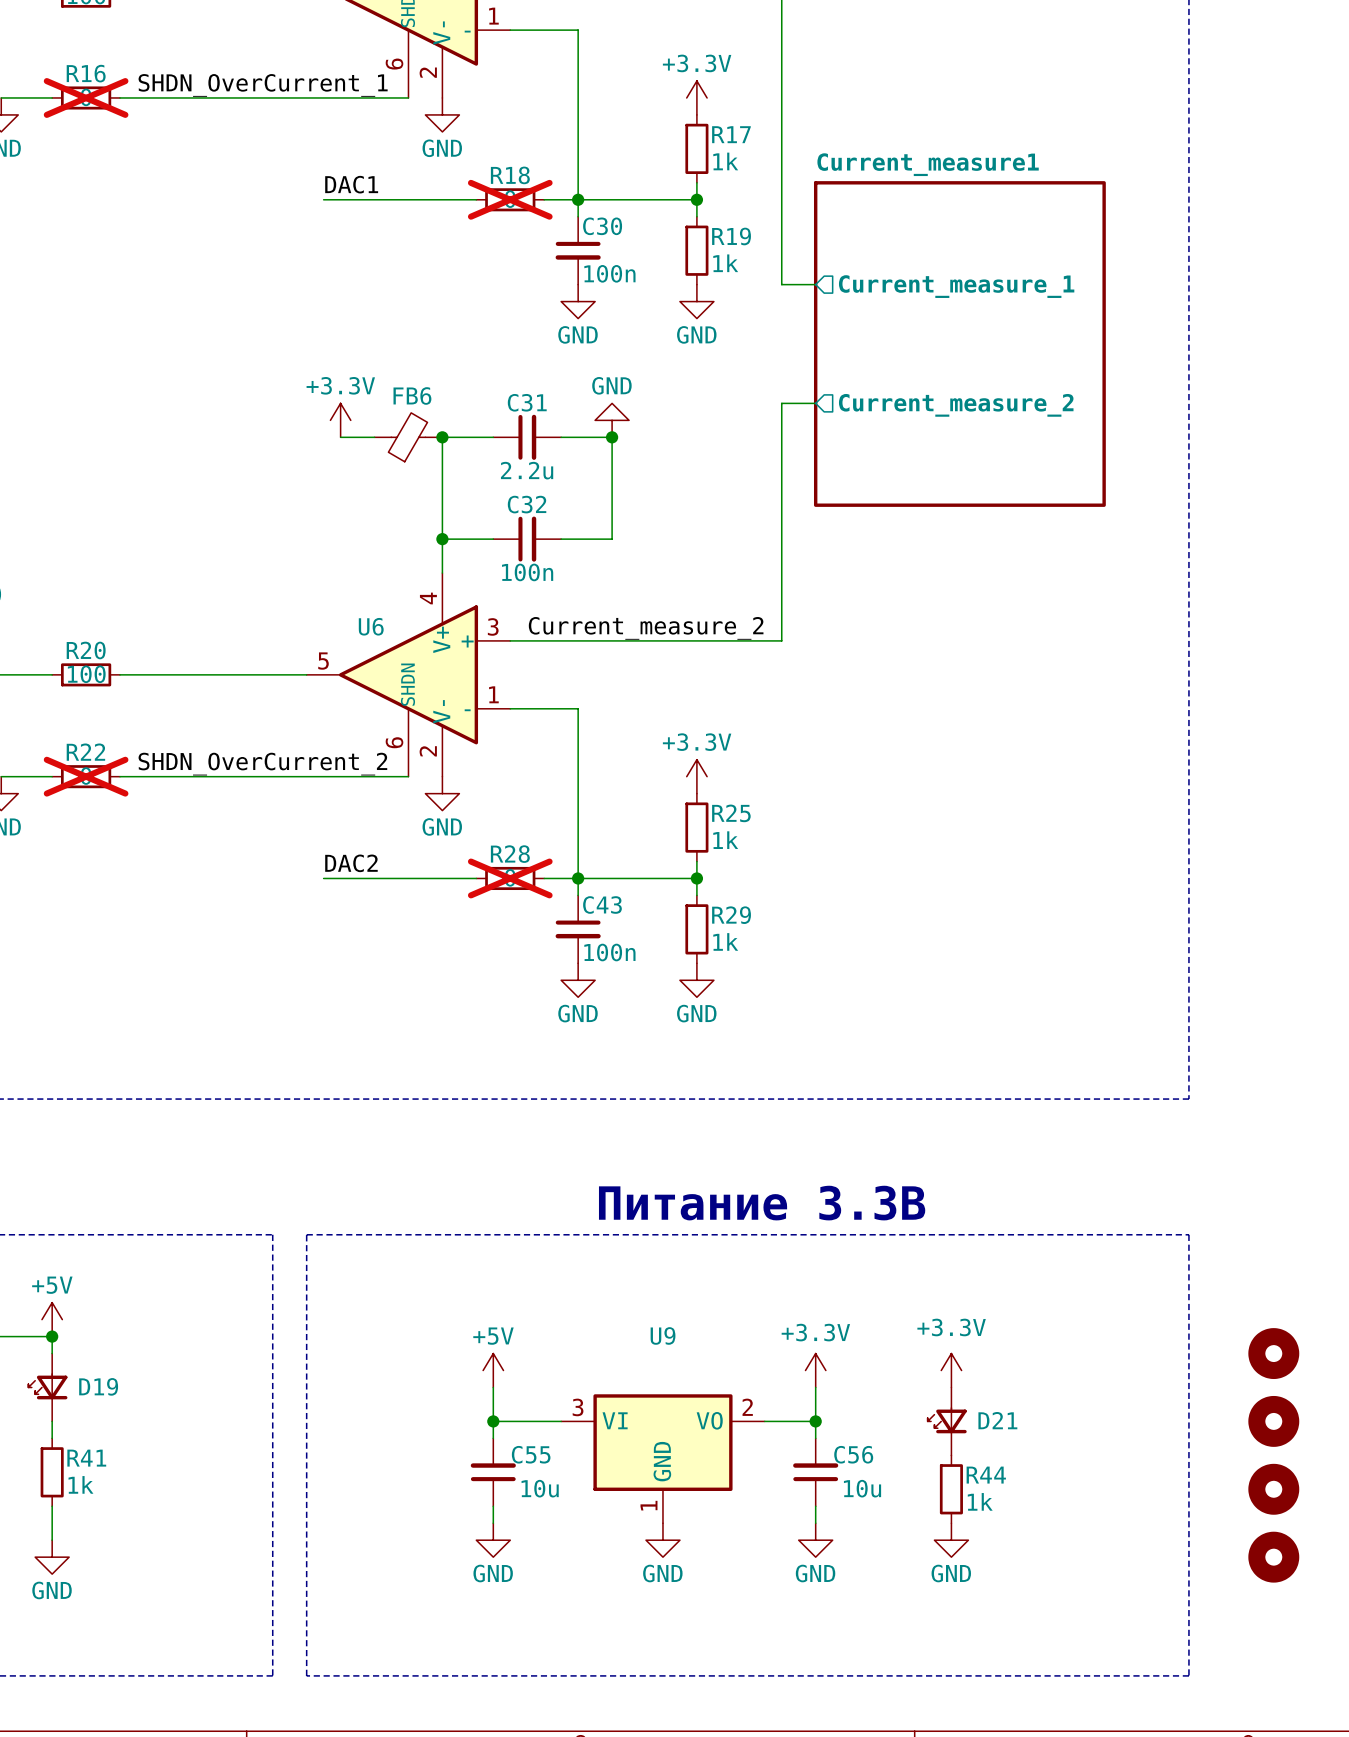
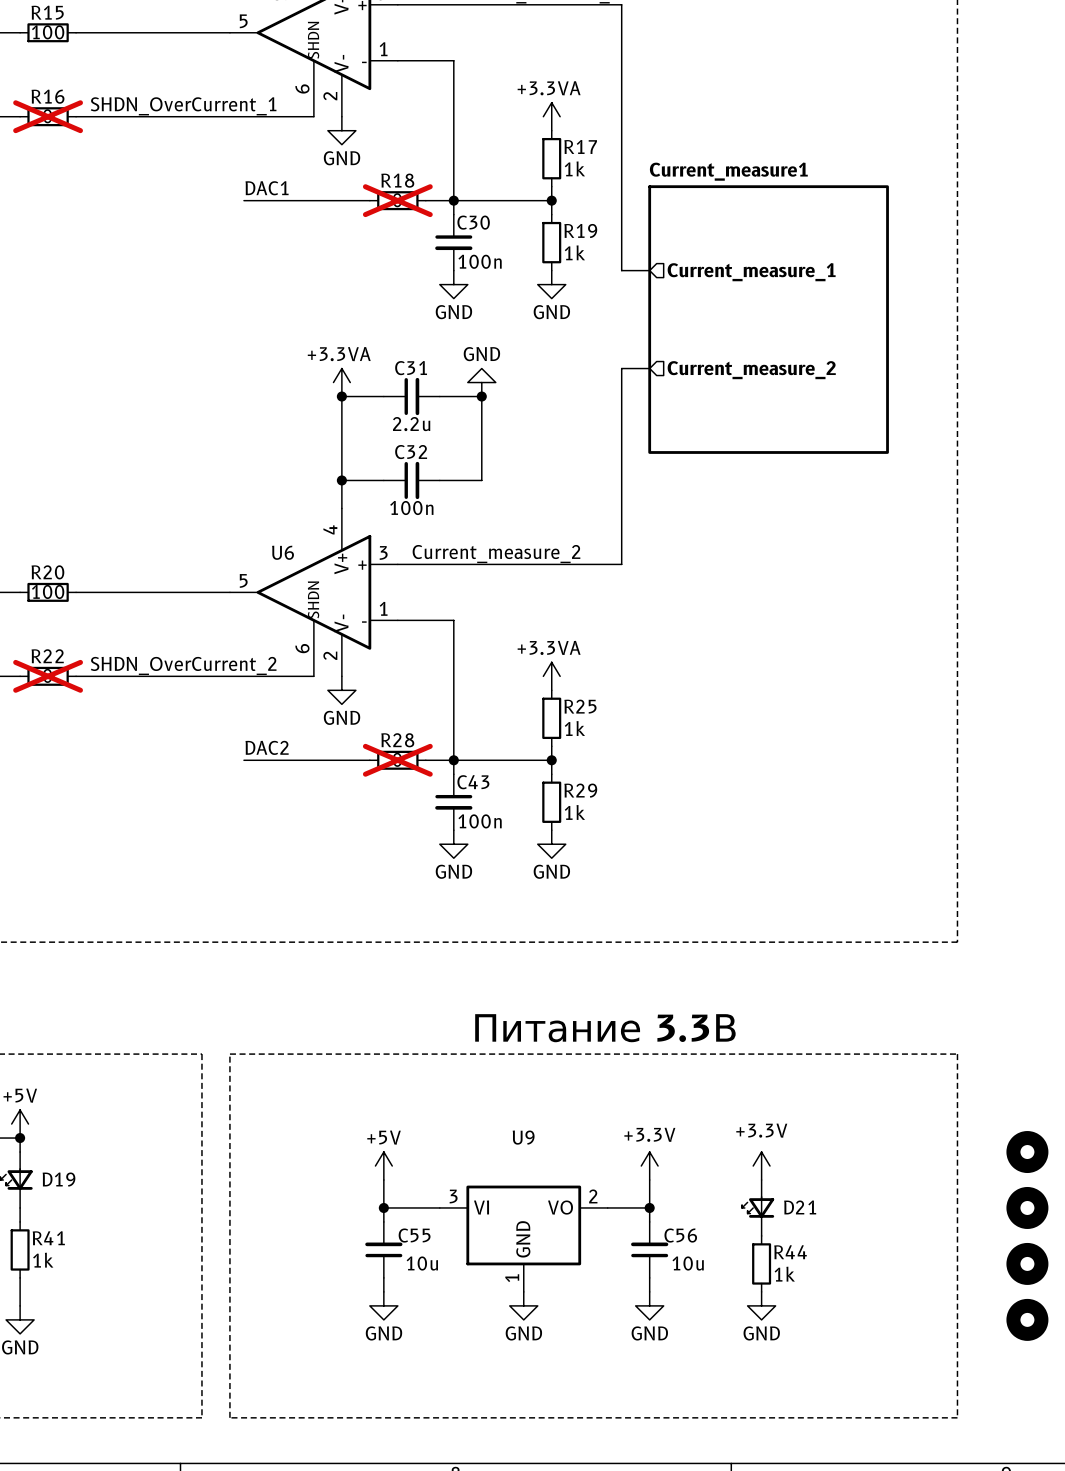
power symbol: +3.3V (696, 97) -> +3.3VA (551, 116)
power symbol: +3.3V (340, 420) -> none
power symbol: none -> +3.3VA (341, 382)
wire: (340, 437) (374, 437) -> none
FB6: (408, 437) -> none
power symbol: +3.3V (696, 776) -> +3.3VA (551, 676)

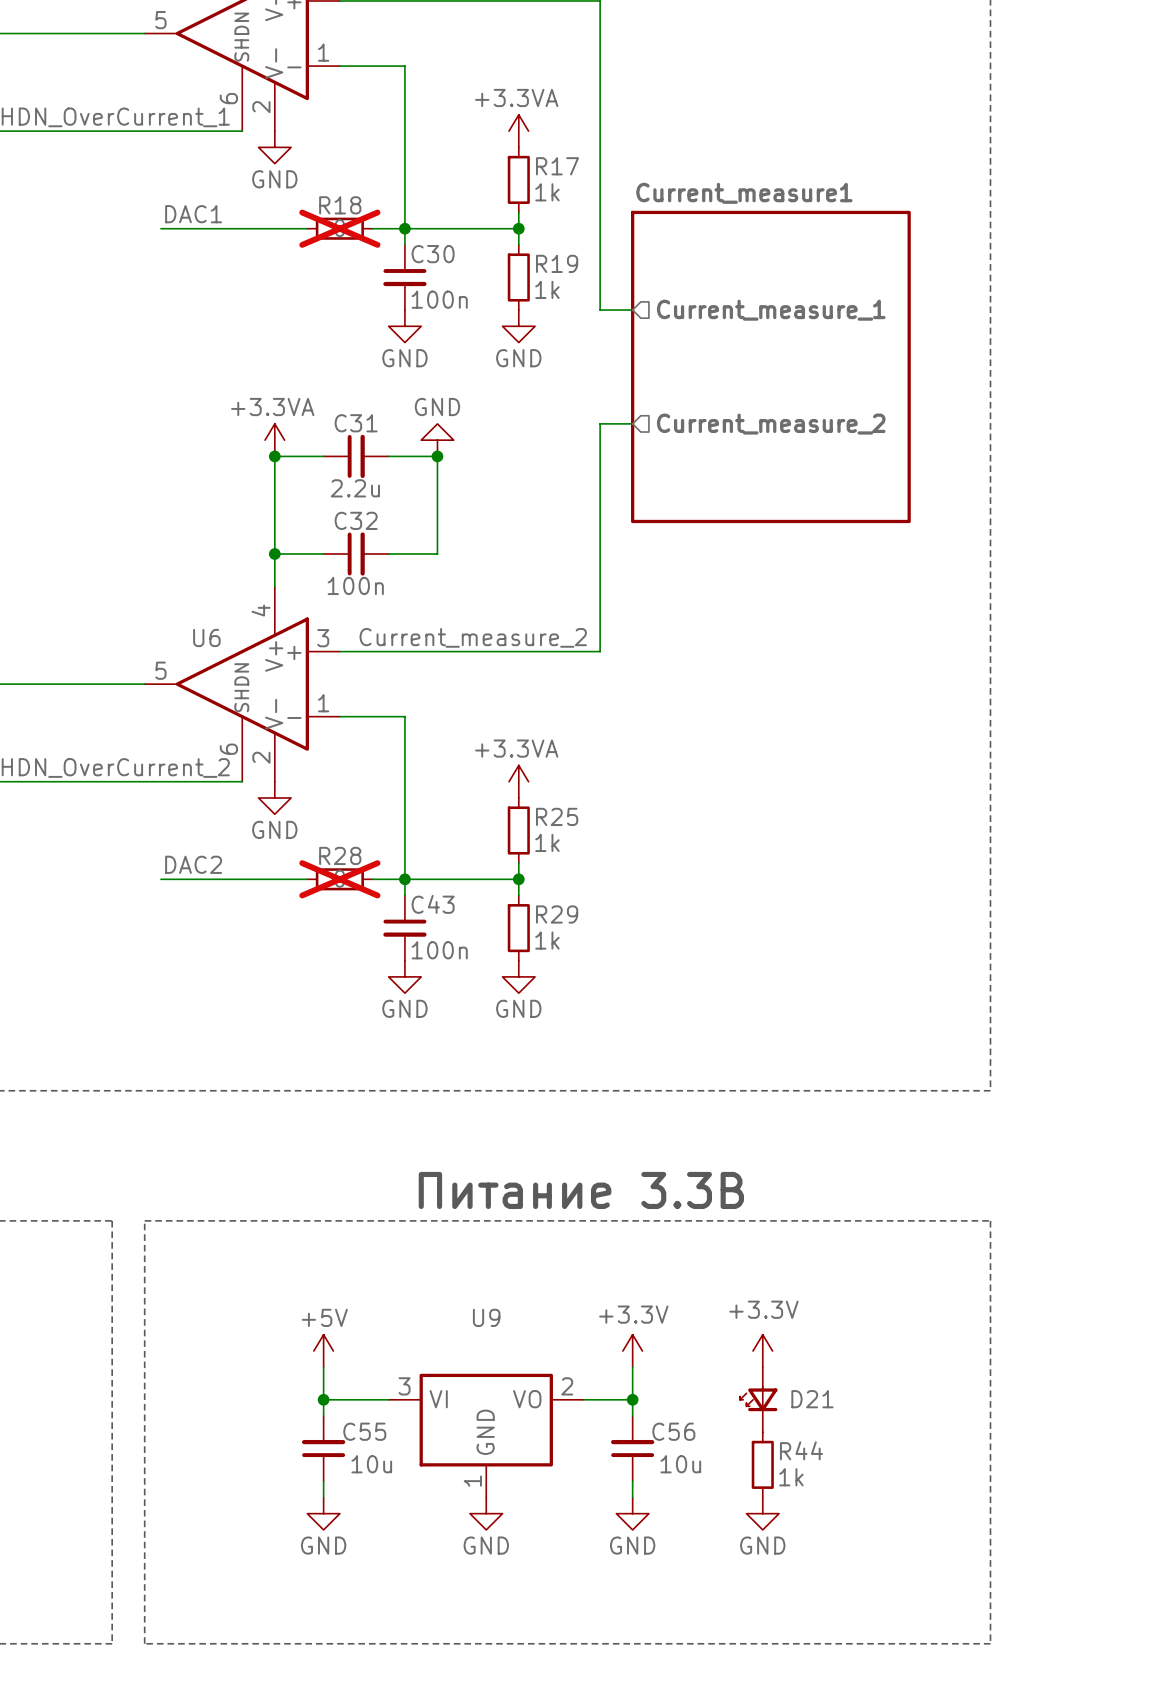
part: (1027, 1152) -> none
part: (1027, 1207) -> none
part: (1027, 1263) -> none
part: (1027, 1319) -> none

